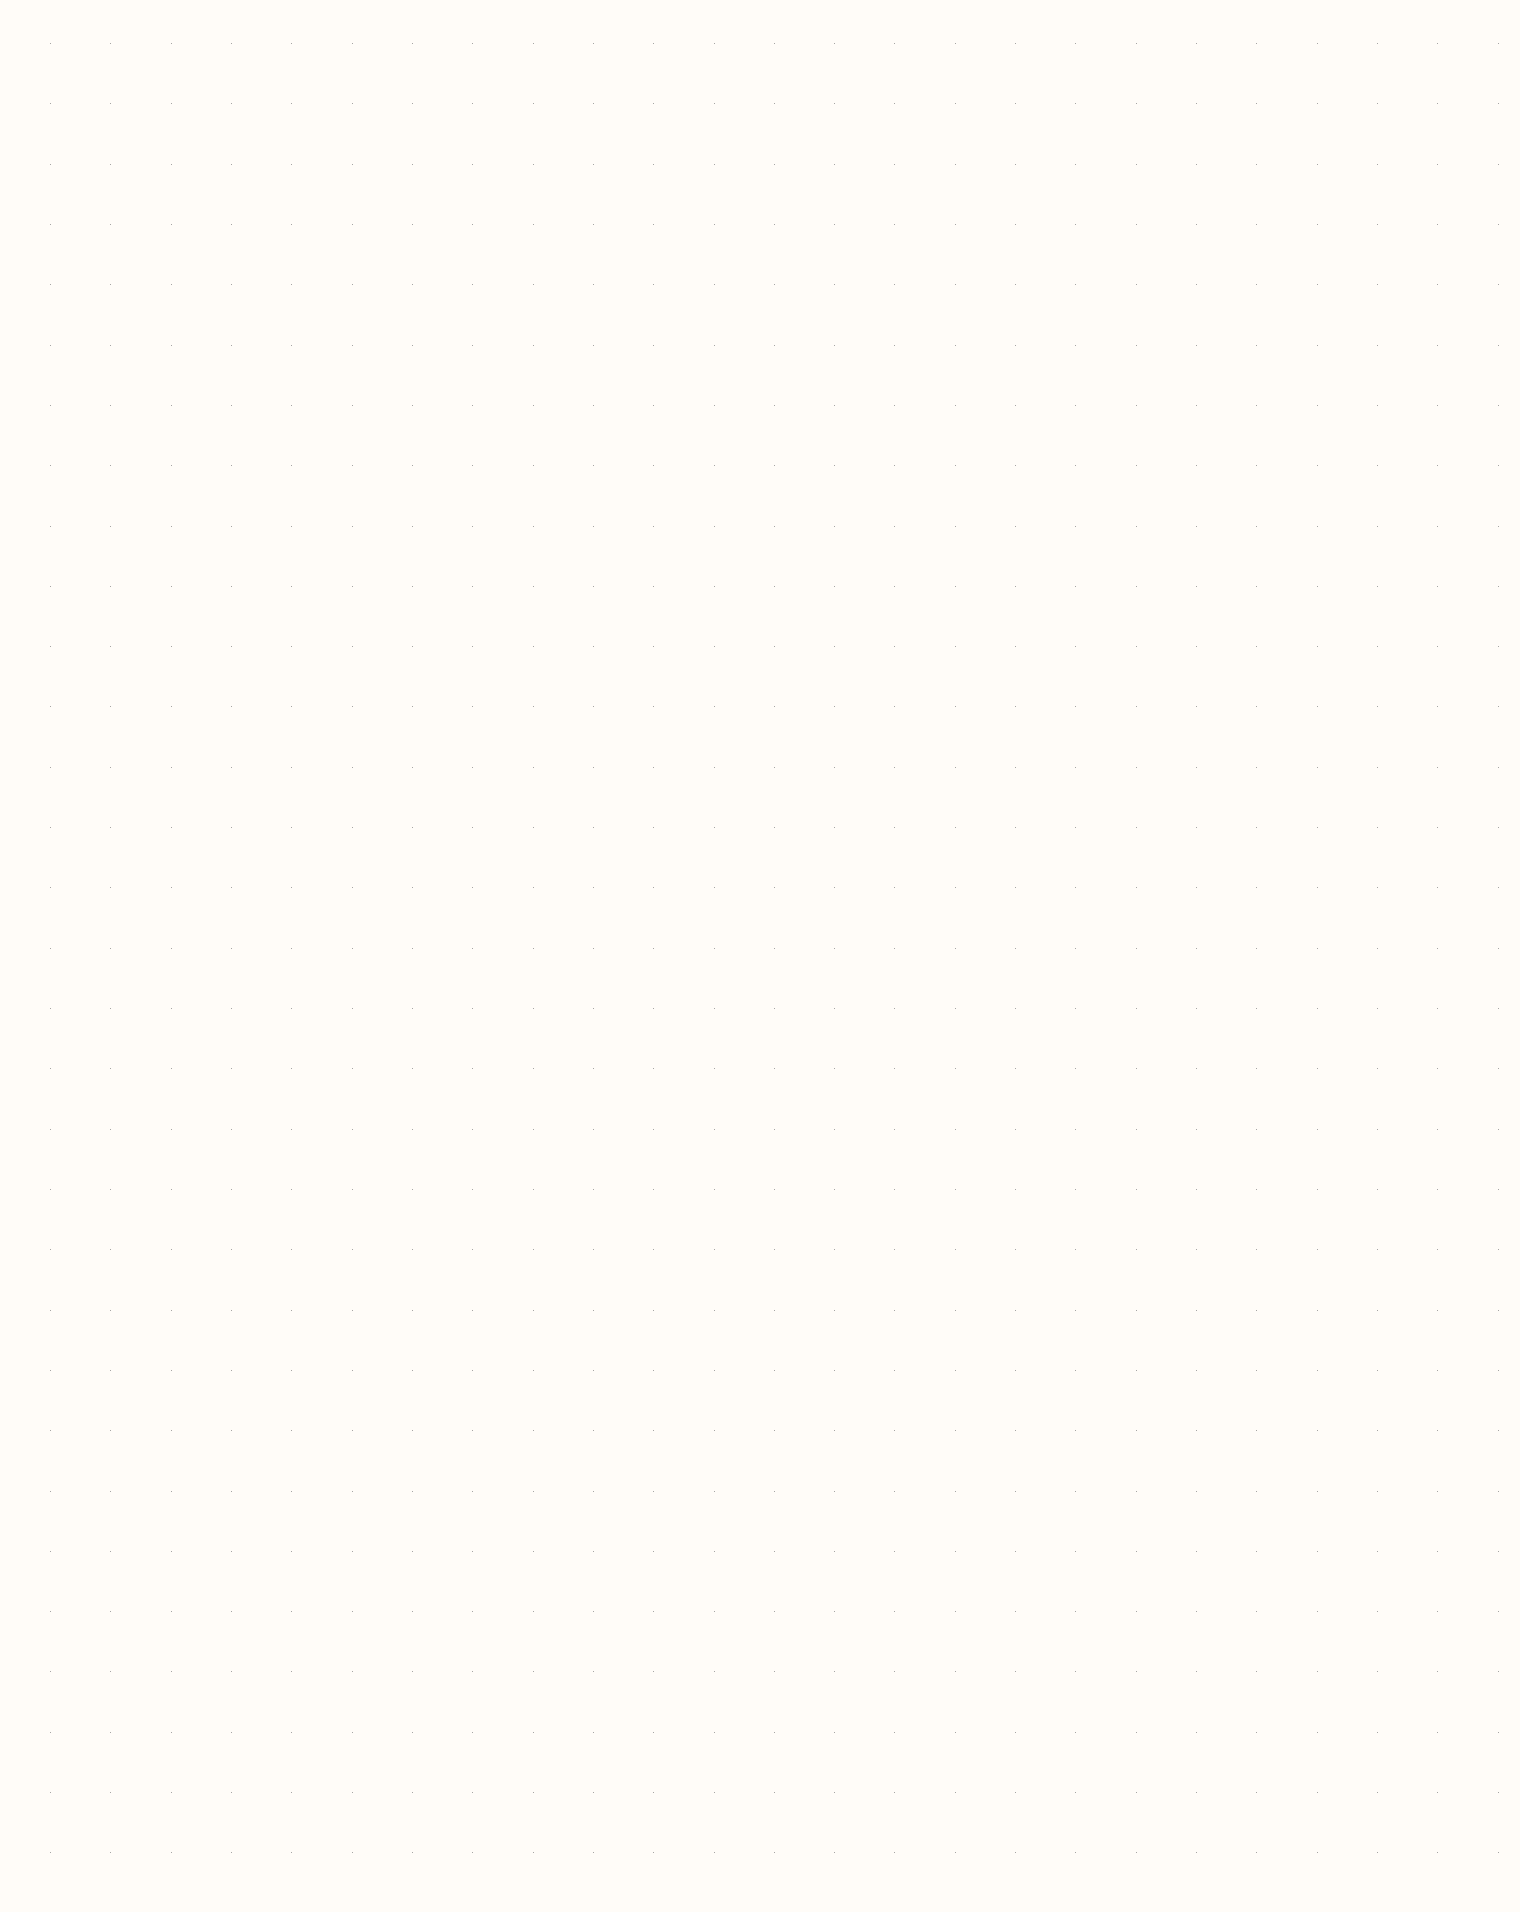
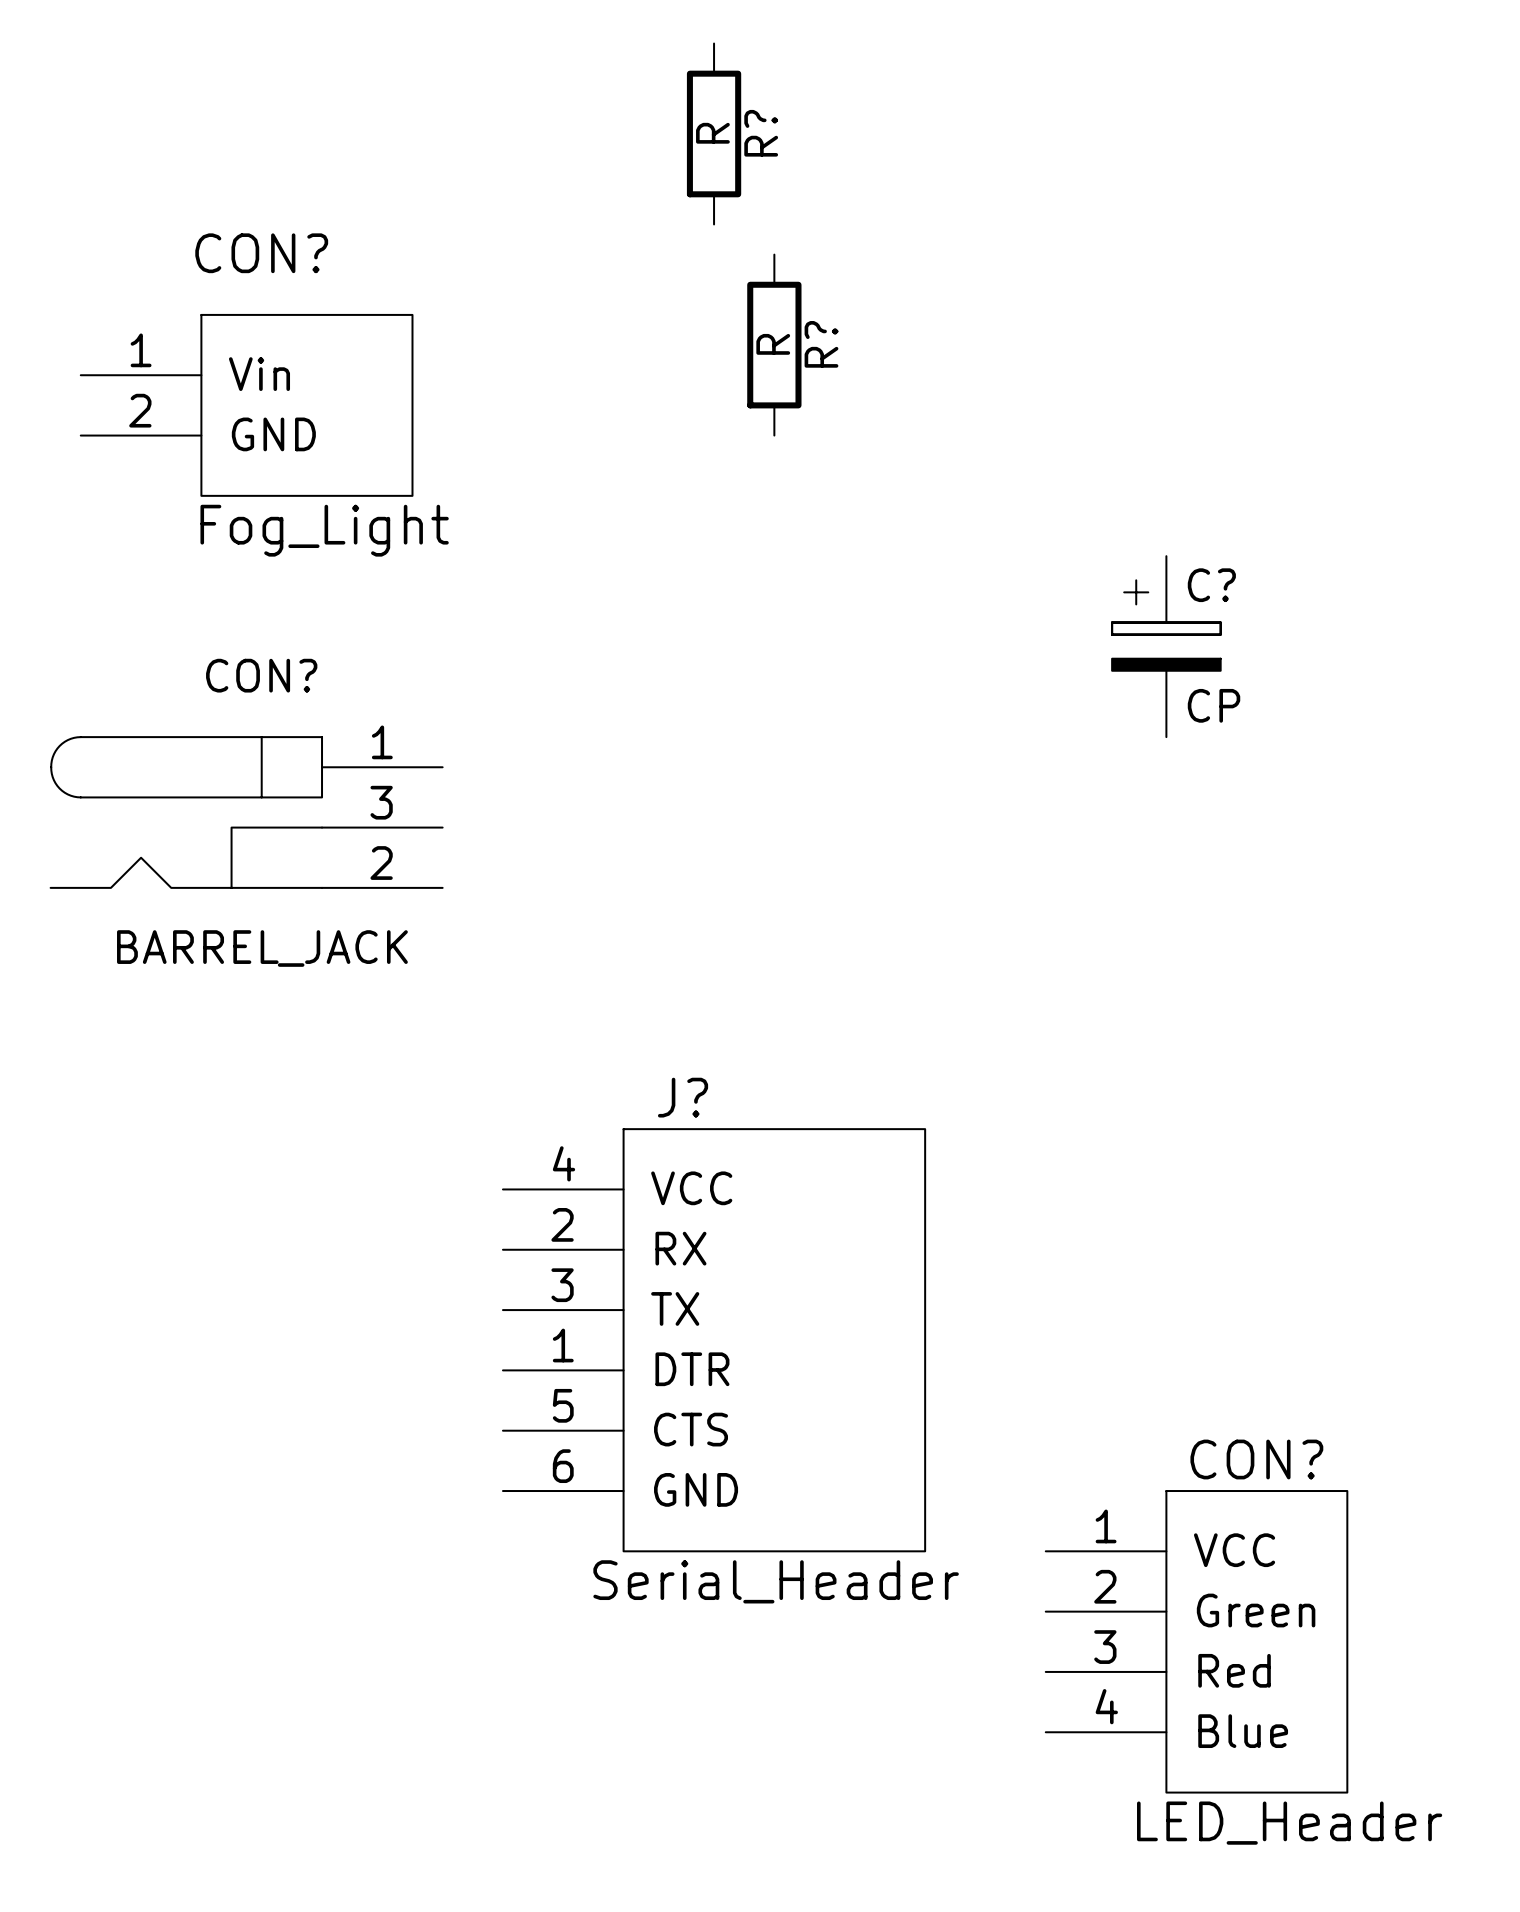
R?: none -> R (714, 133)
R?: none -> R (774, 345)
CON?: none -> Fog_Light (246, 405)
C?: none -> CP (1166, 646)
CON?: none -> BARREL_JACK (246, 812)
J?: none -> Serial_Header (714, 1340)
CON?: none -> LED_Header (1196, 1641)

